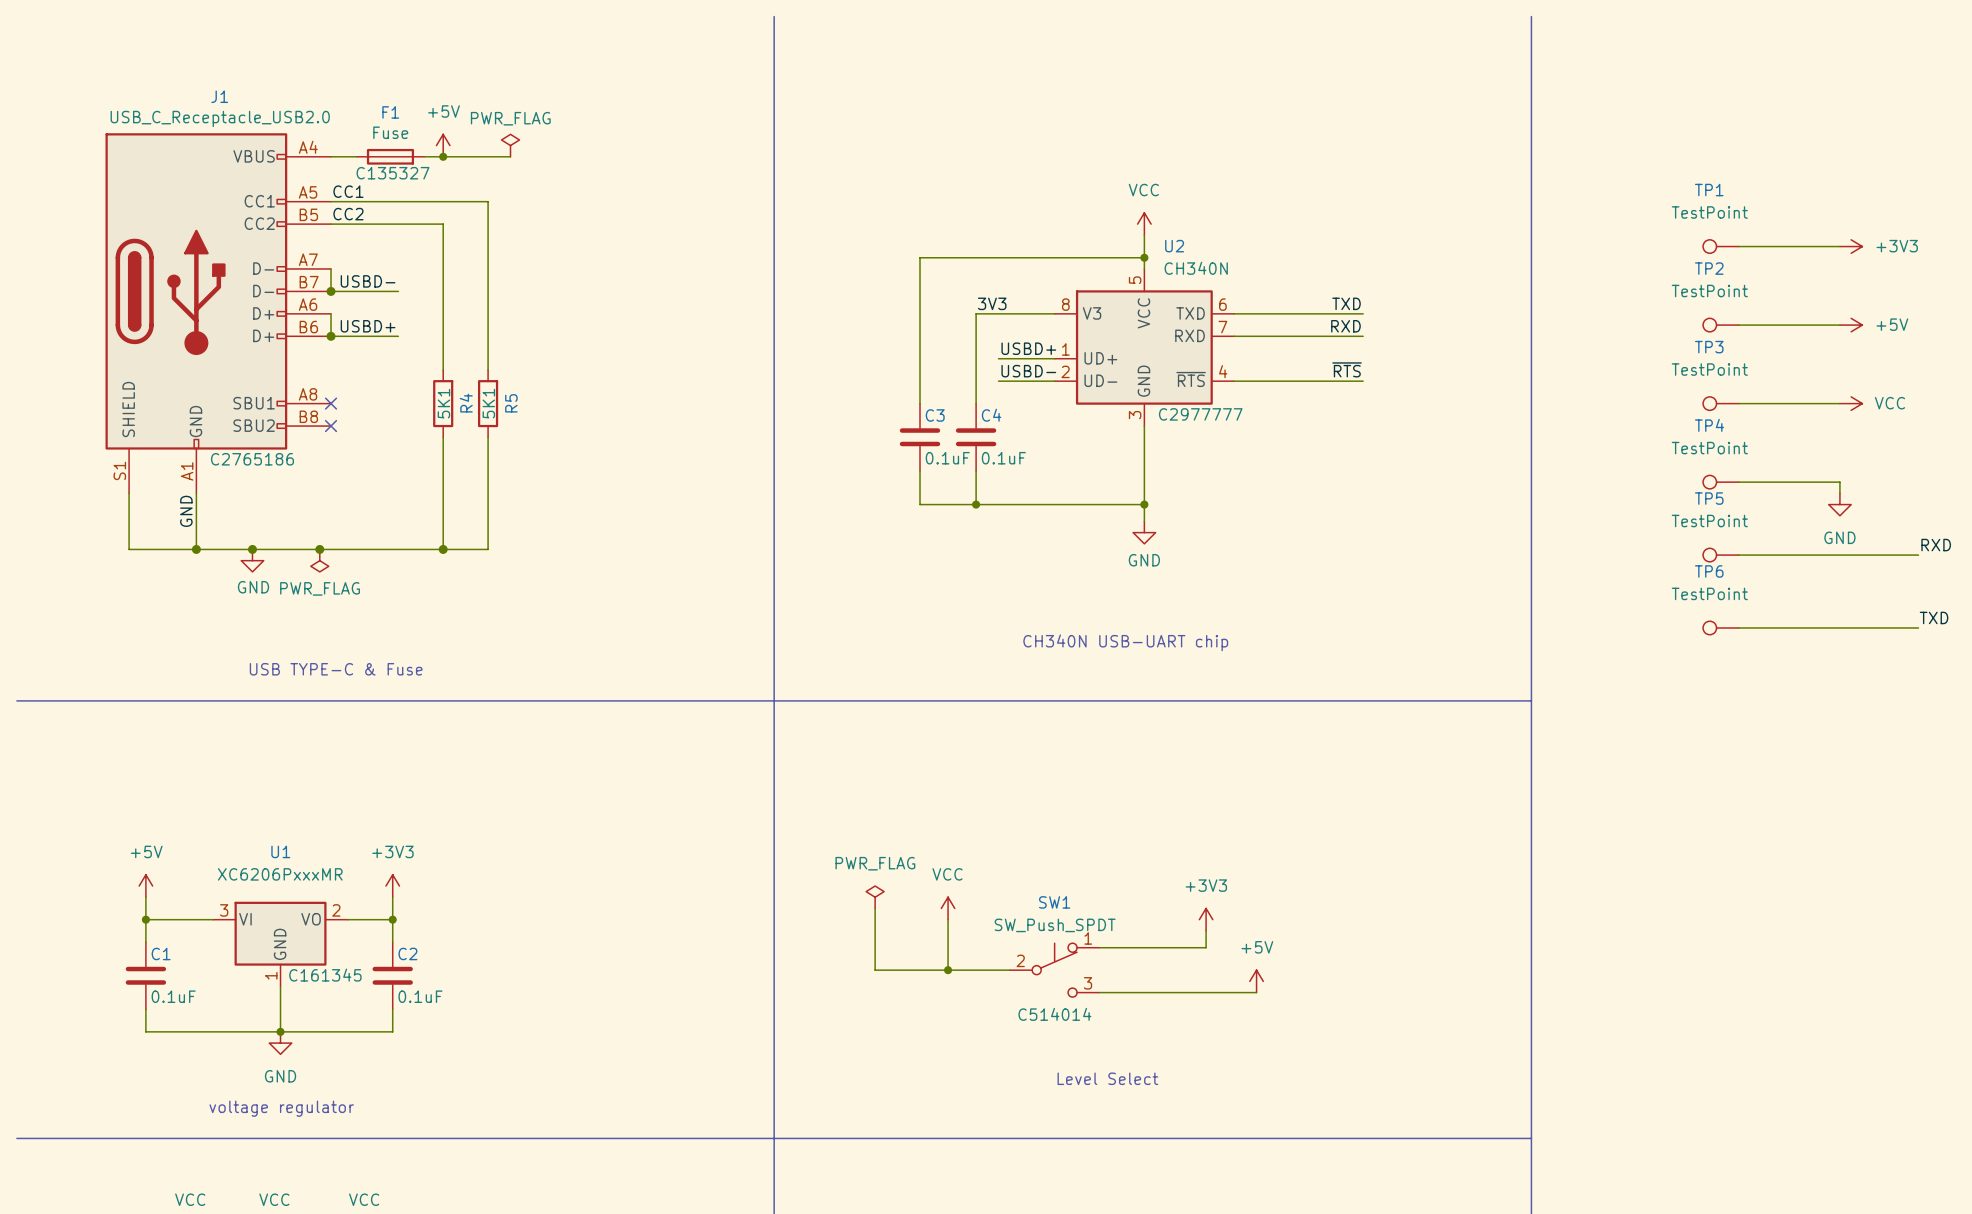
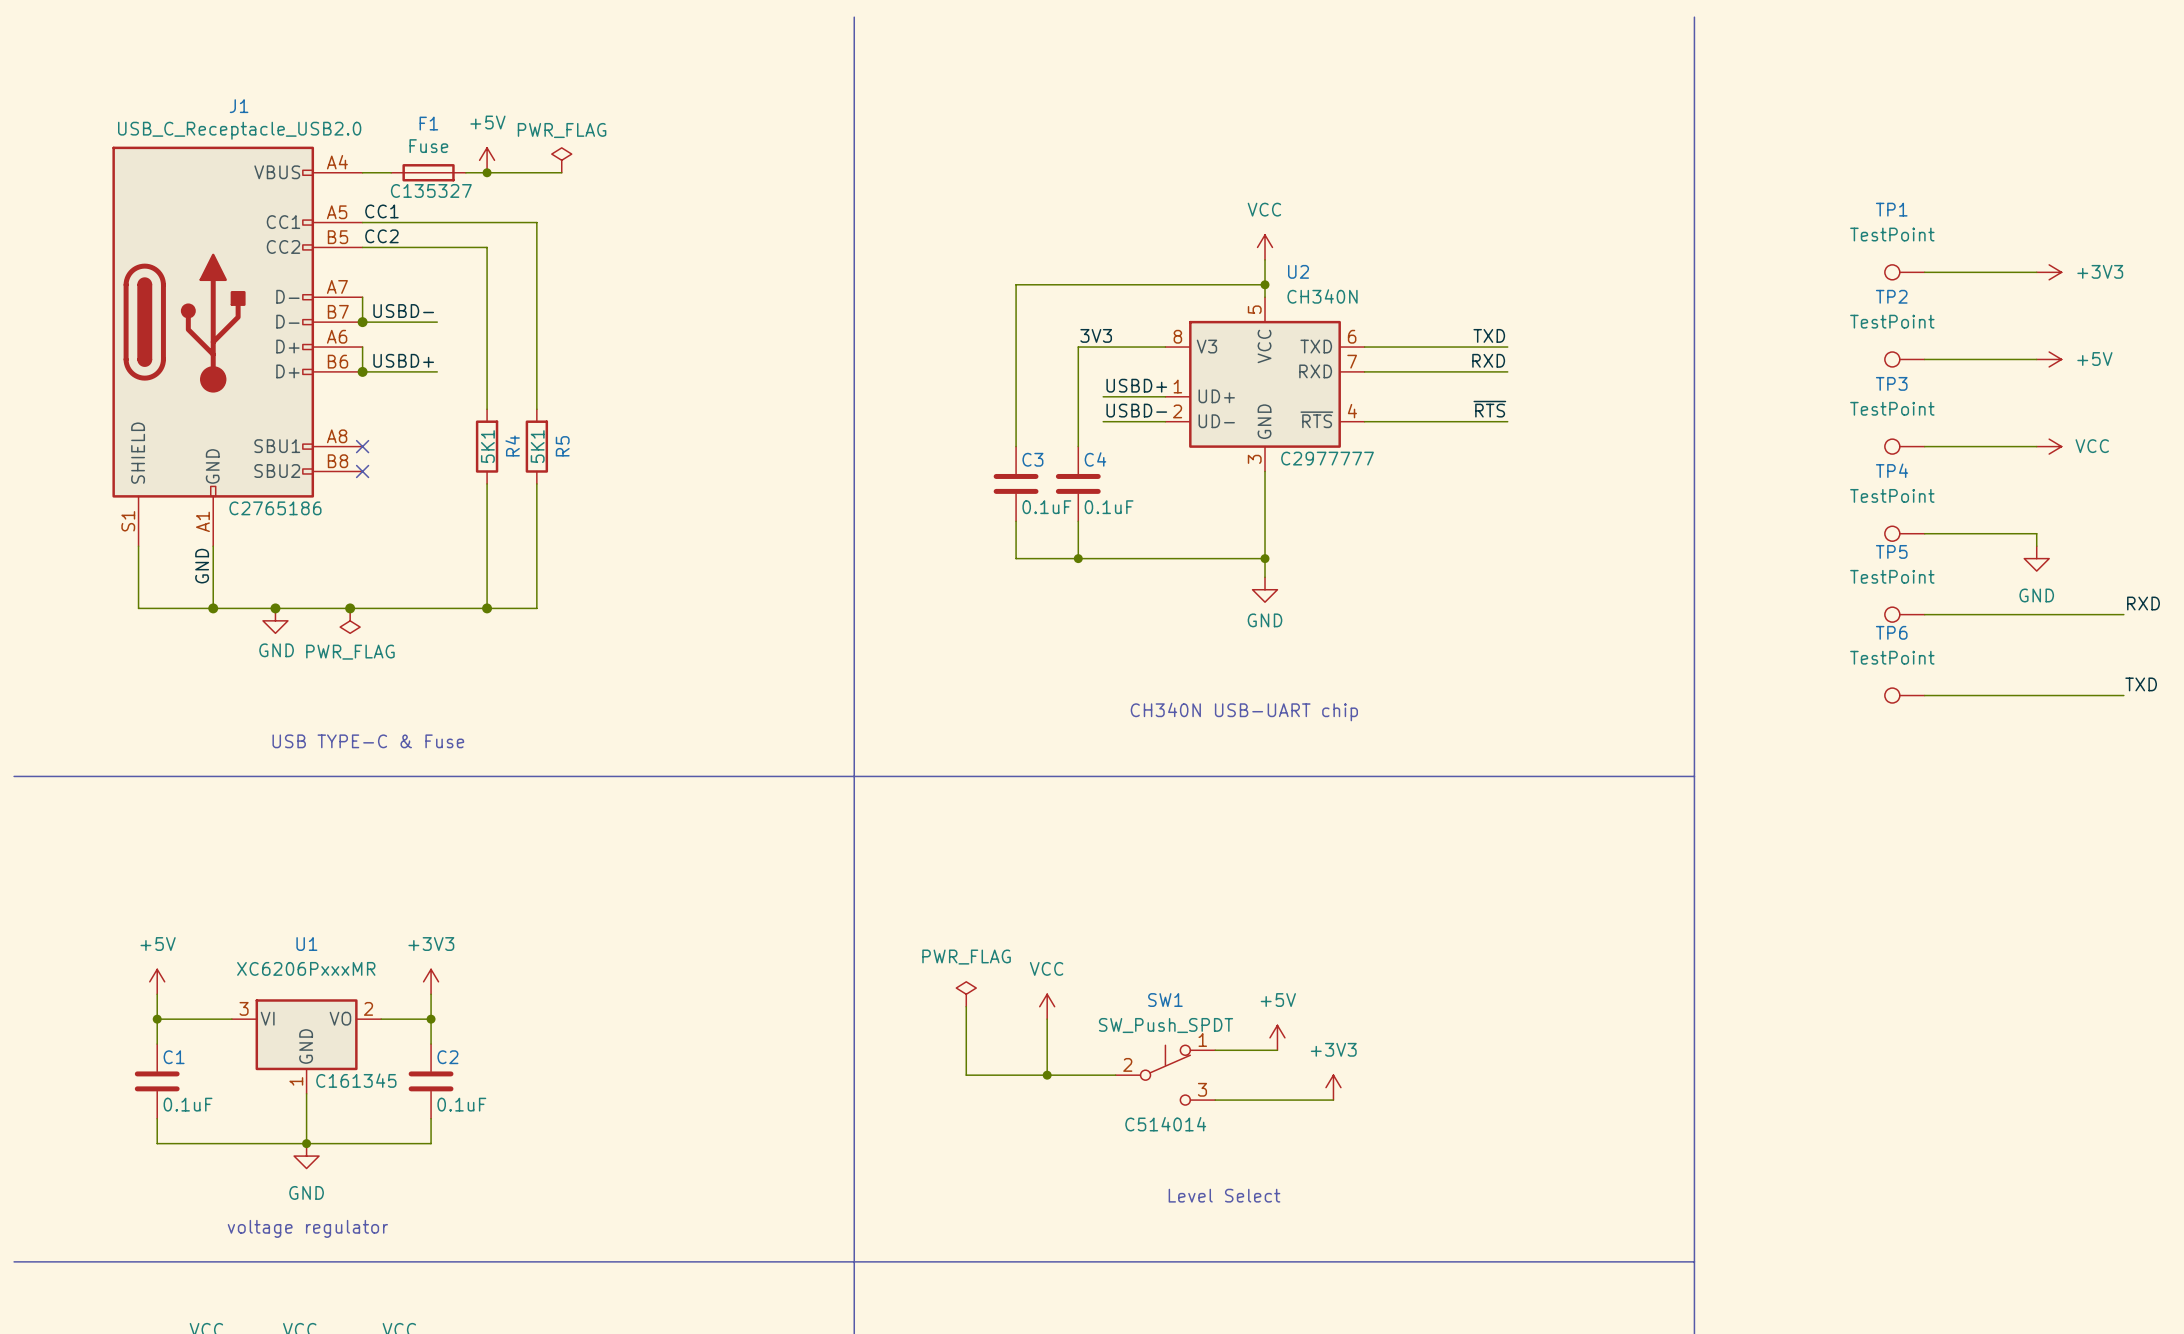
power symbol position: +3V3 (1206, 919) -> +3V3 (1333, 1087)
wire: (1206, 930) (1206, 947) (1155, 947) -> none
power symbol position: +5V (1256, 981) -> +5V (1277, 1037)
wire: (1206, 992) (1256, 992) -> none

